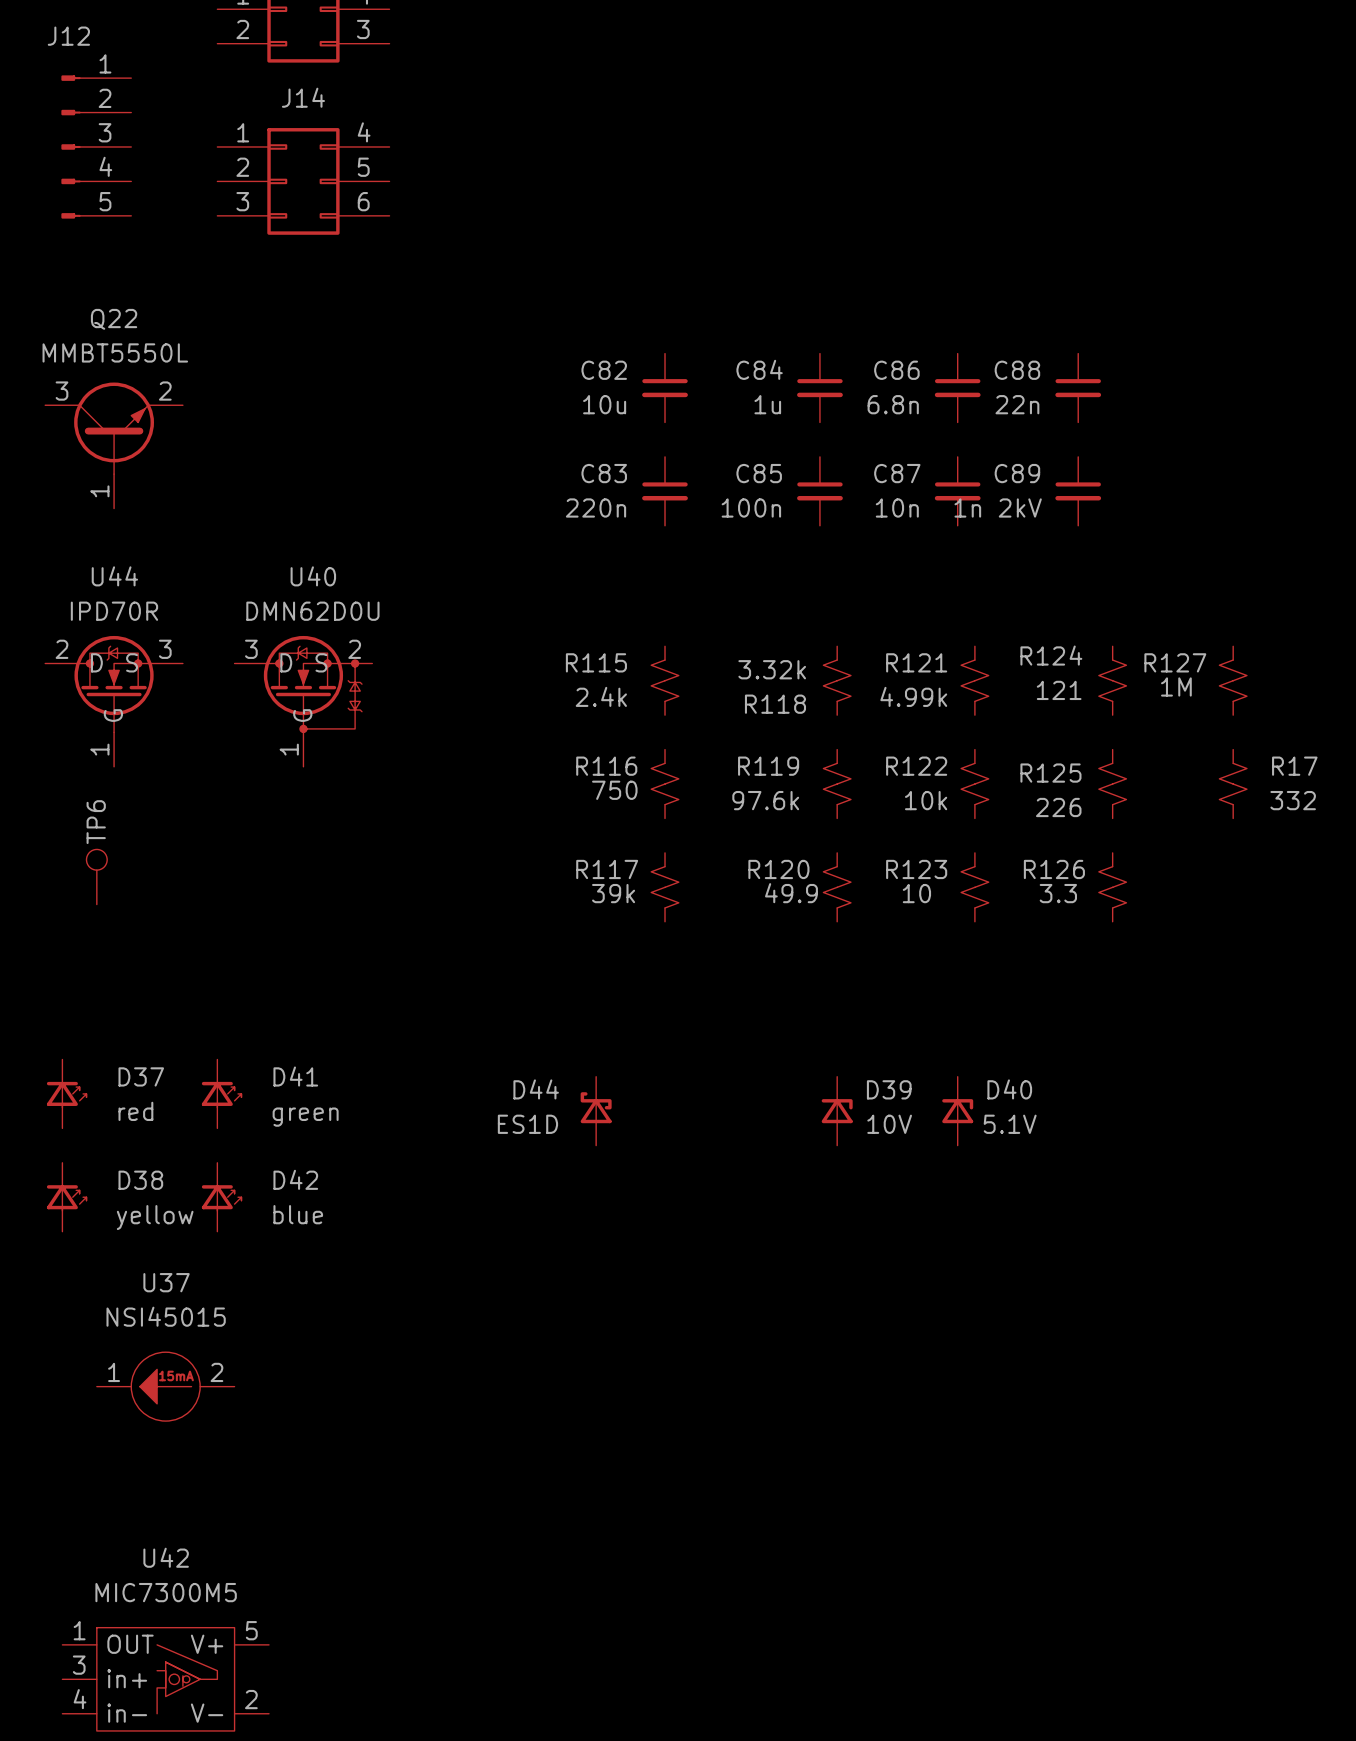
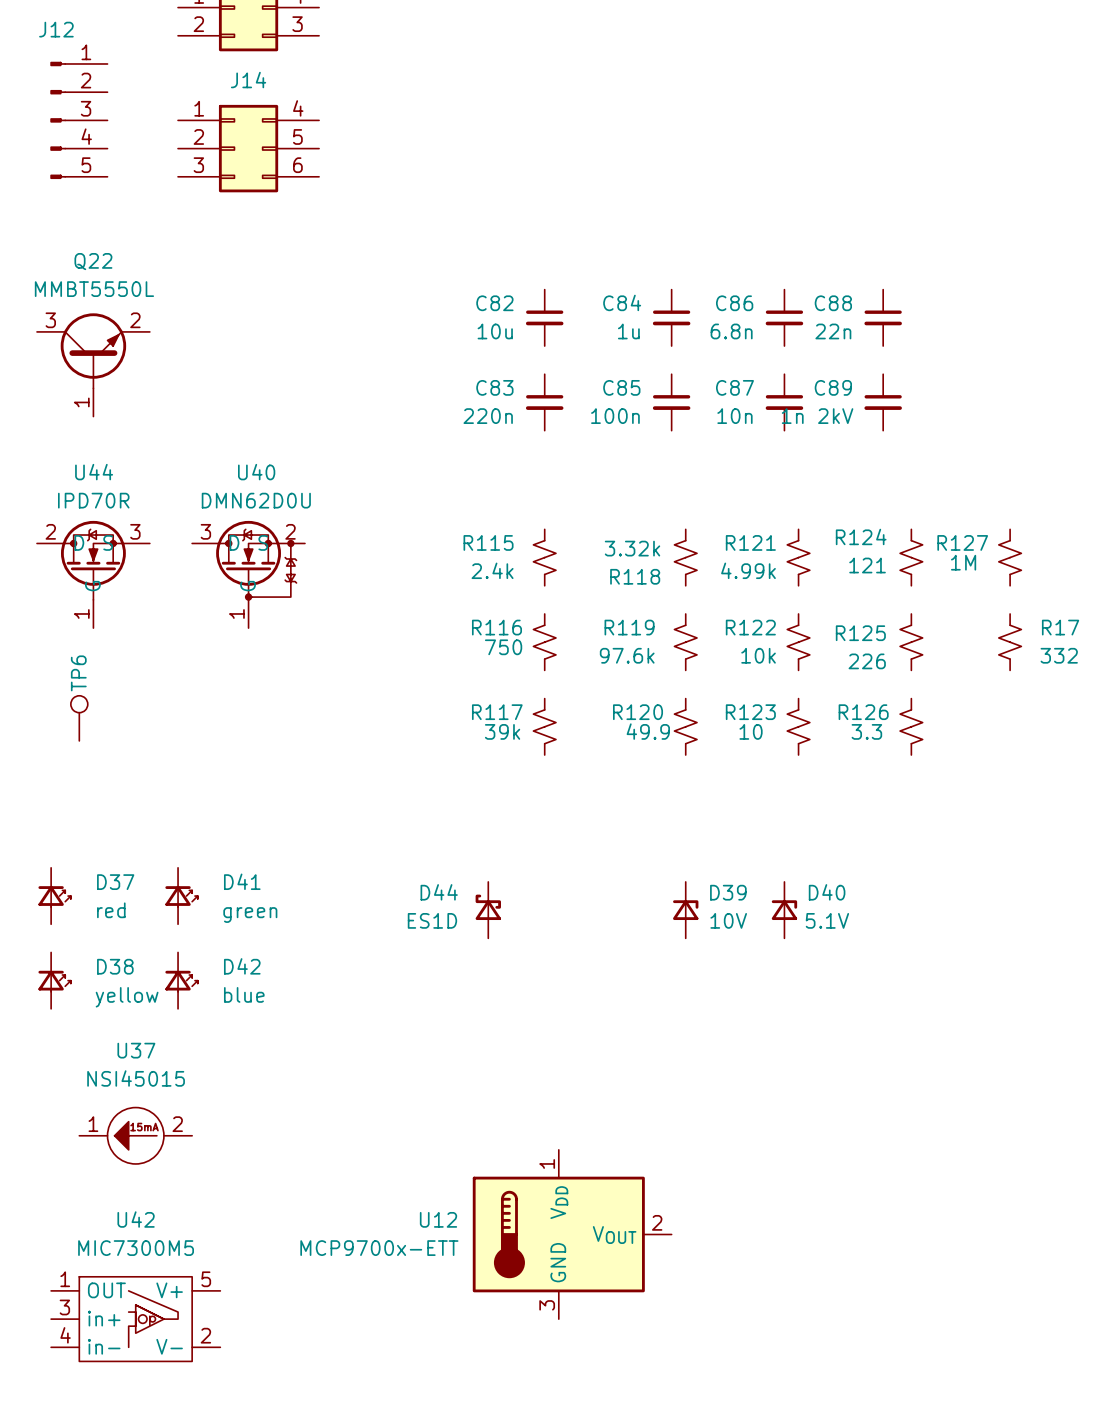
U12: none -> MCP9700x-ETT (572, 1234)
U42 position: (165, 1679) -> (135, 1319)

